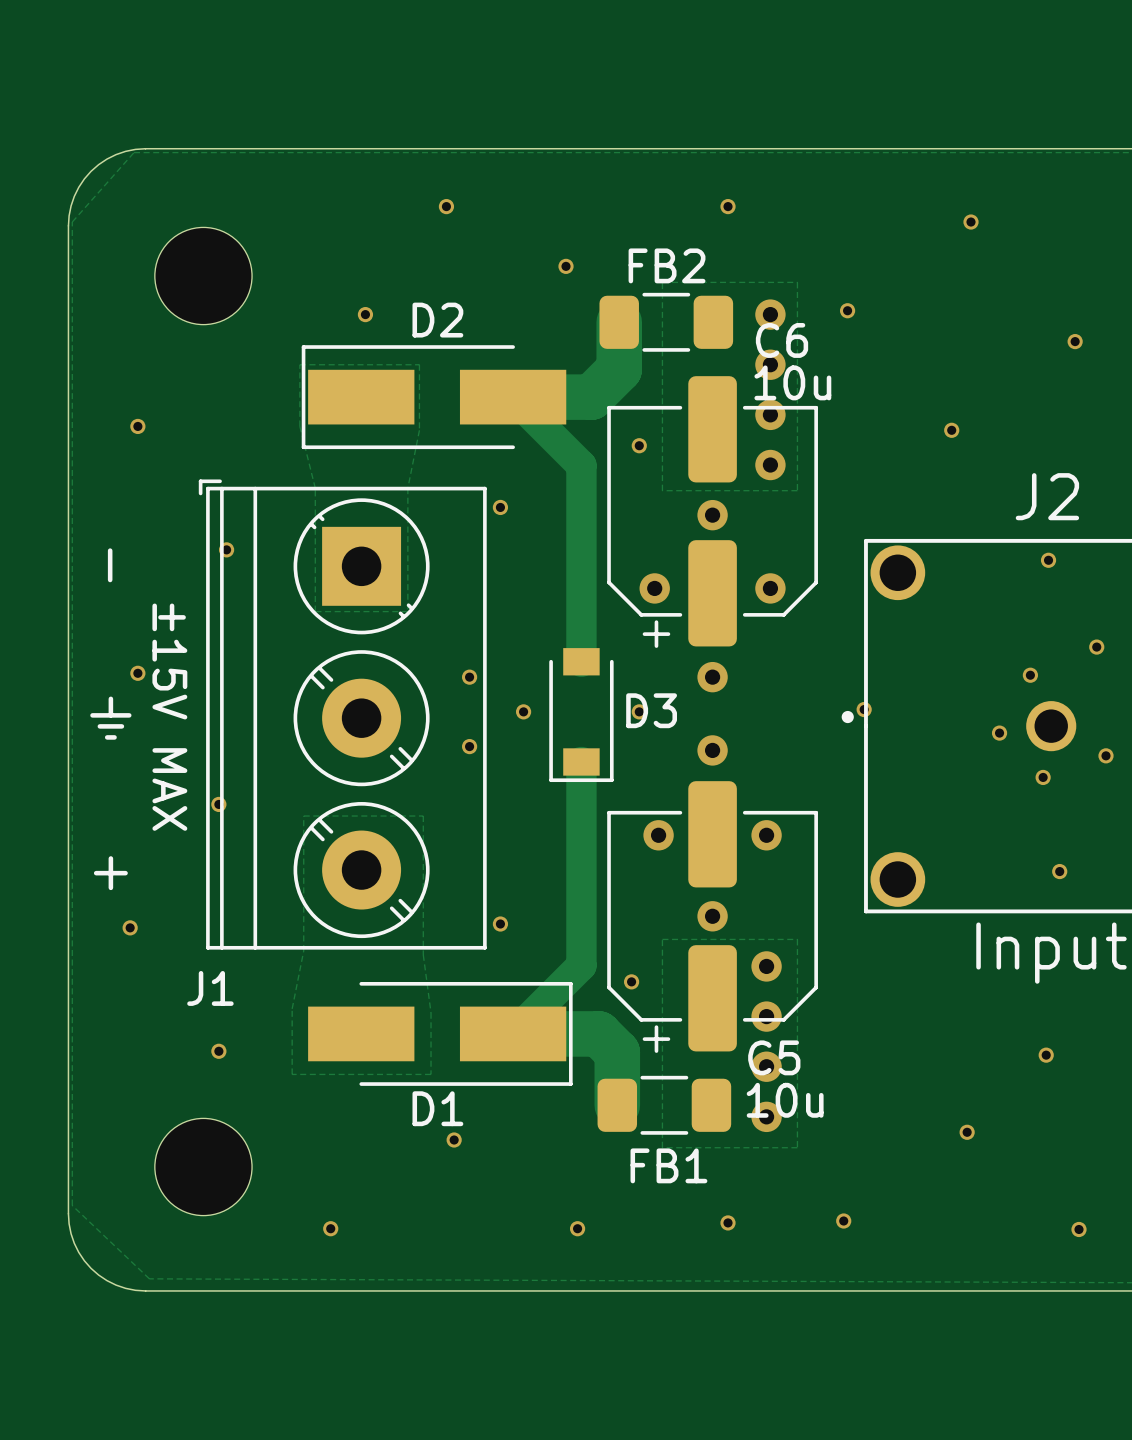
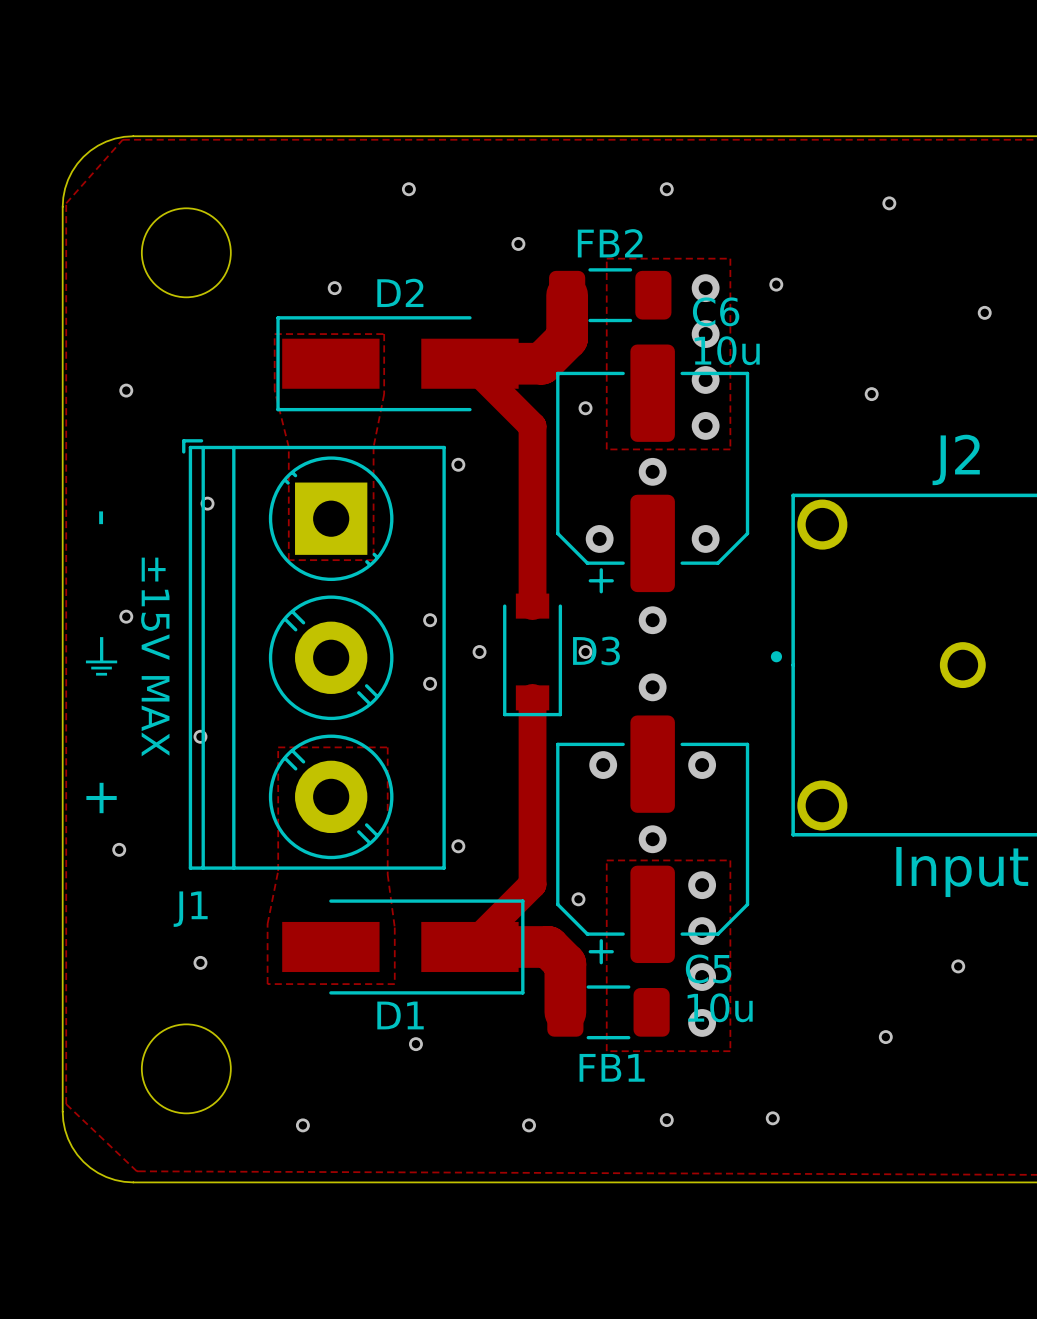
via: (1048, 560) -> none
via: (1096, 647) -> none
via: (1030, 675) -> none
via: (864, 709) -> none
via: (999, 733) -> none
via: (1106, 755) -> none
via: (1043, 777) -> none
via: (1059, 871) -> none
via: (1079, 1229) -> none

